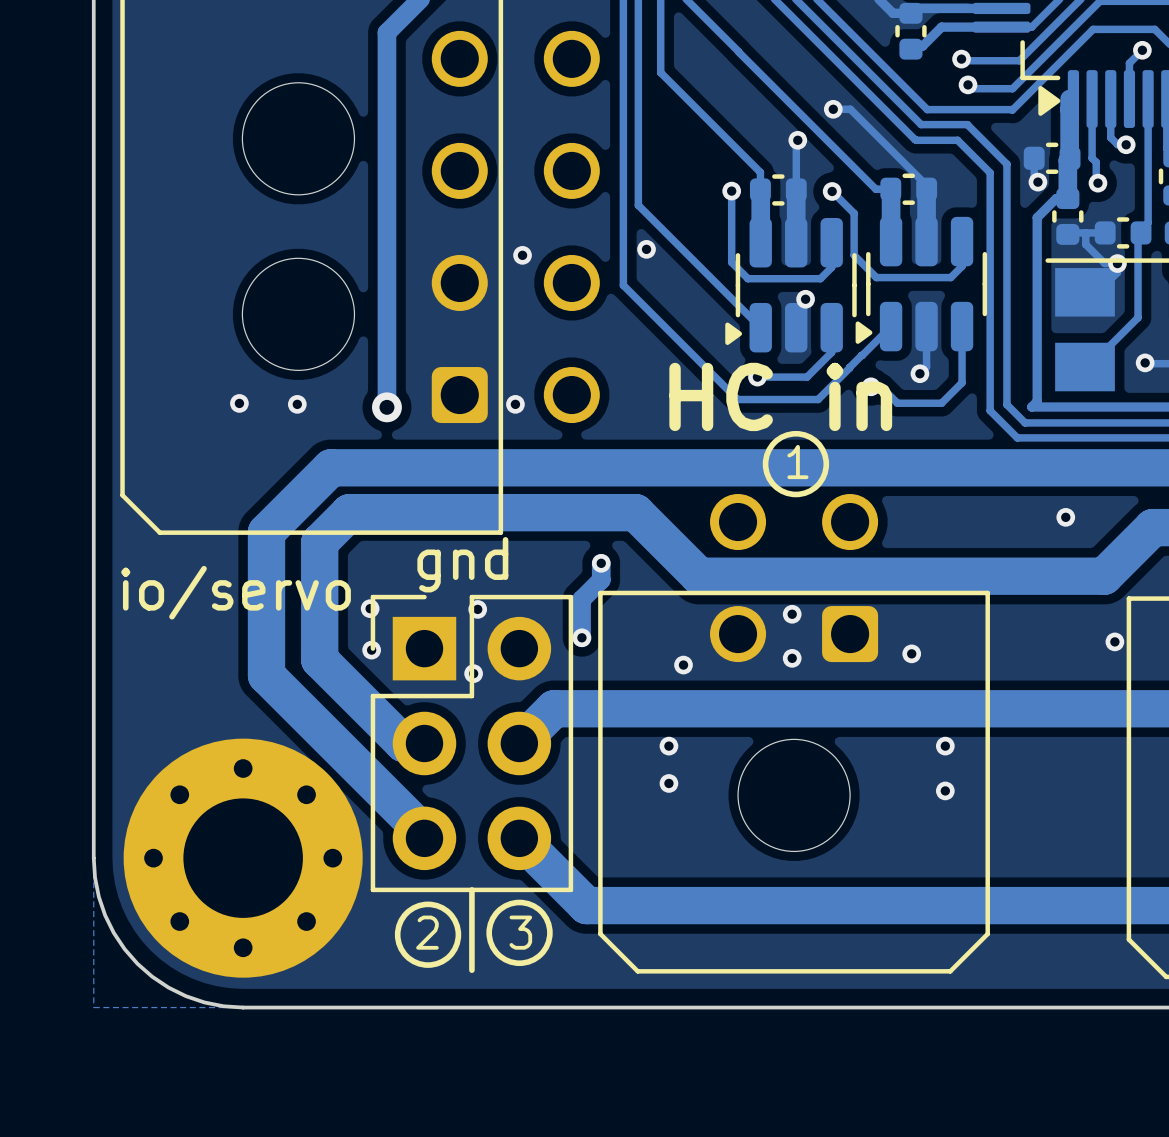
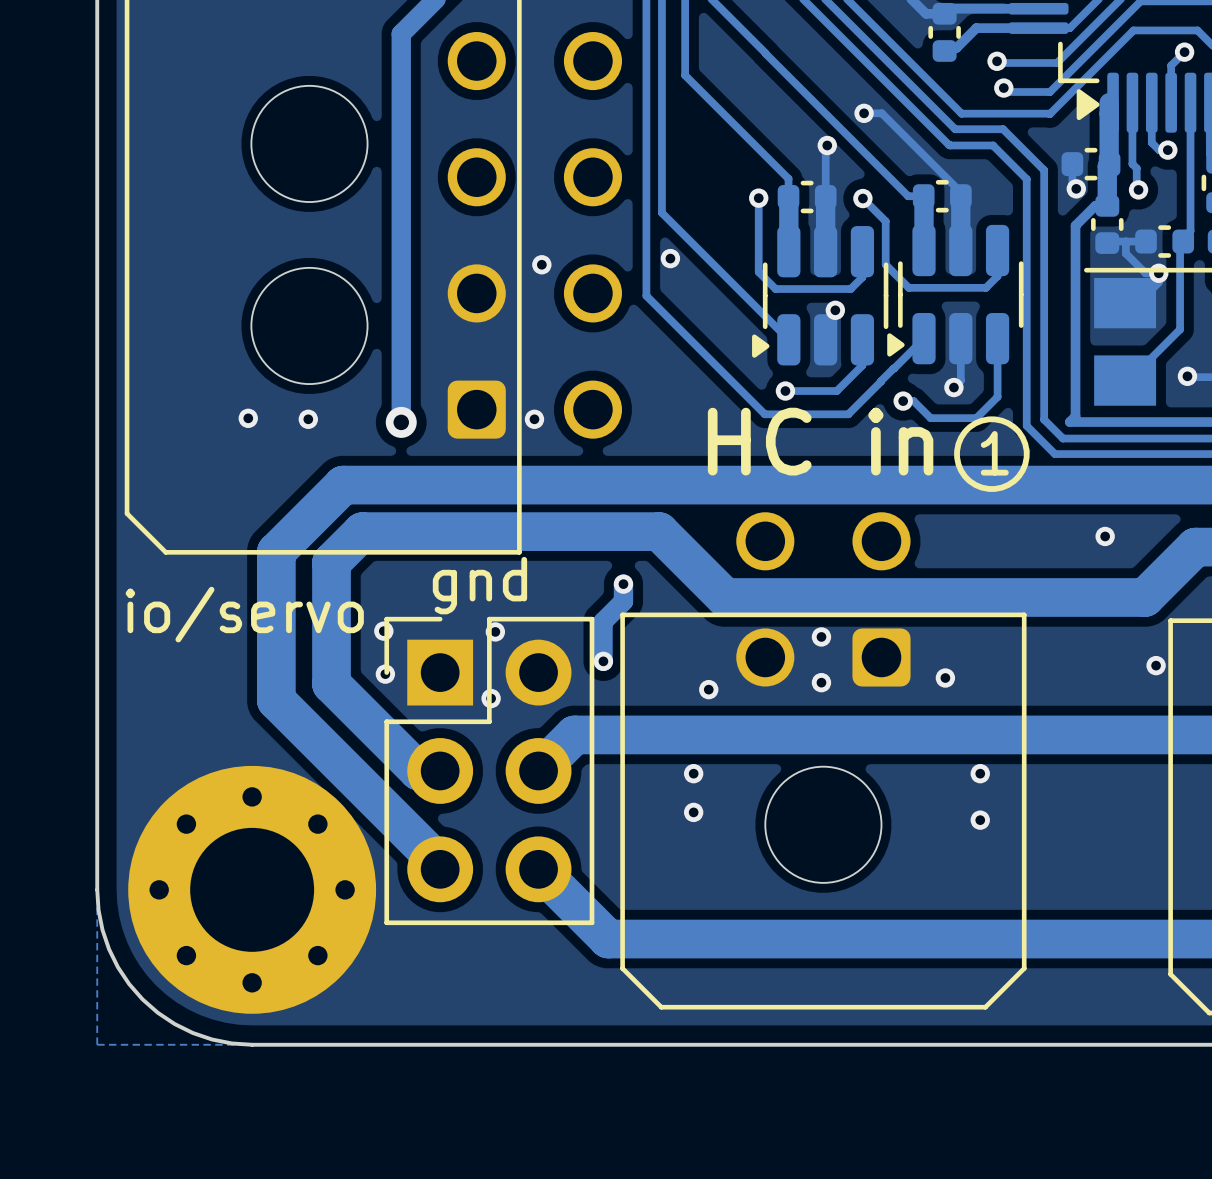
text position: HC in (780, 396) -> HC in (820, 441)
drawing: none -> [954, 416, 1030, 492]
drawing: [762, 430, 830, 498] -> none
text position: 1 (797, 462) -> 1 (994, 453)
line: (471, 889) (471, 970) -> none
drawing: [394, 899, 553, 968] -> none
text: 2 (427, 932) -> none
text: 3 (520, 932) -> none

